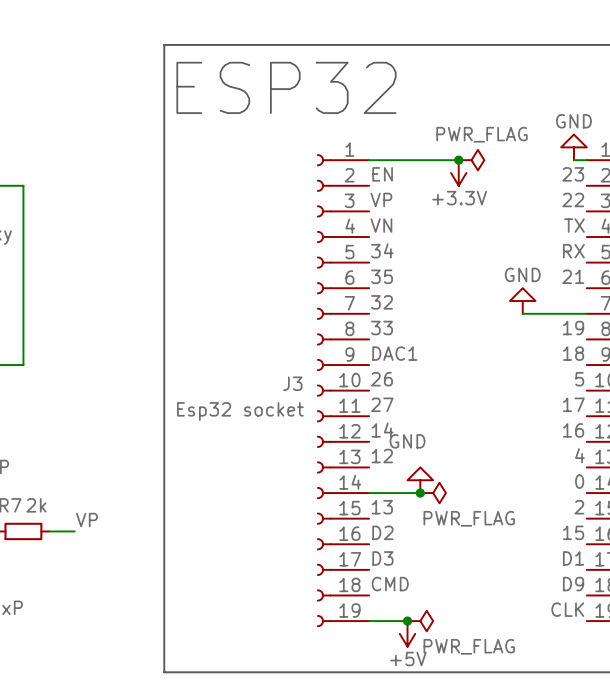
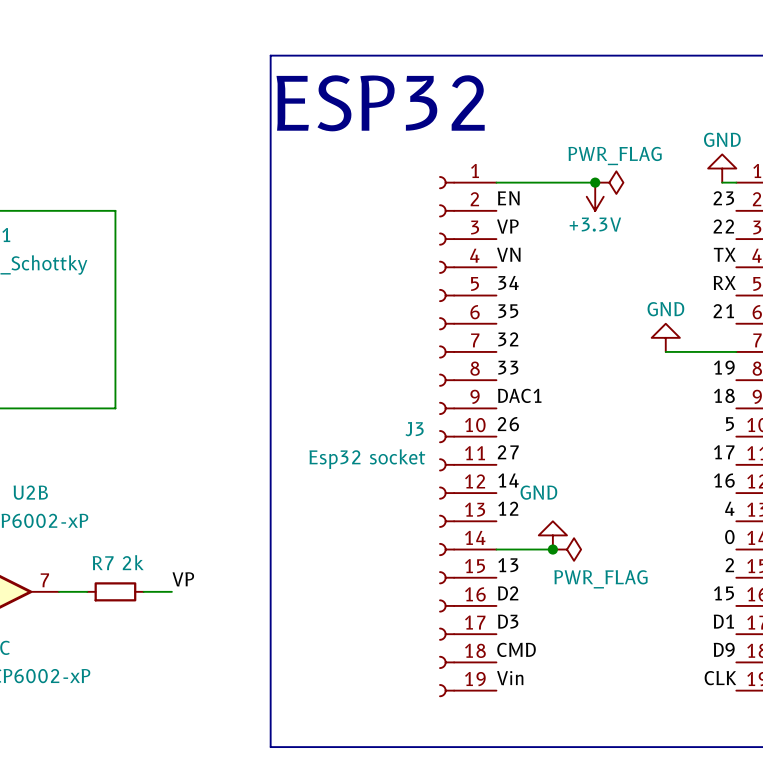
label: none -> Vin (510, 678)
wire: (369, 621) (407, 621) -> none
junction: (407, 621) -> none
power symbol: PWR_FLAG (420, 621) -> none
power symbol: +5V (407, 633) -> none

